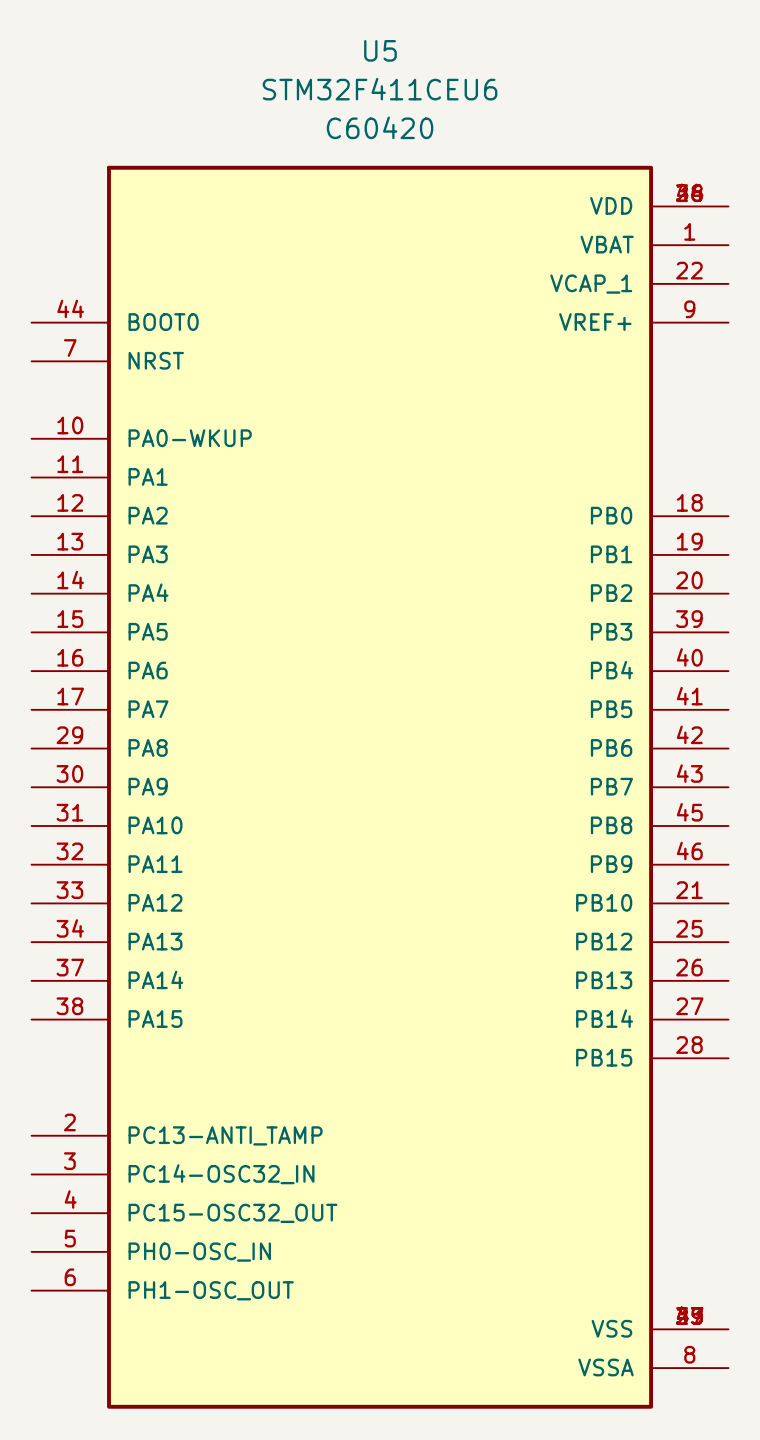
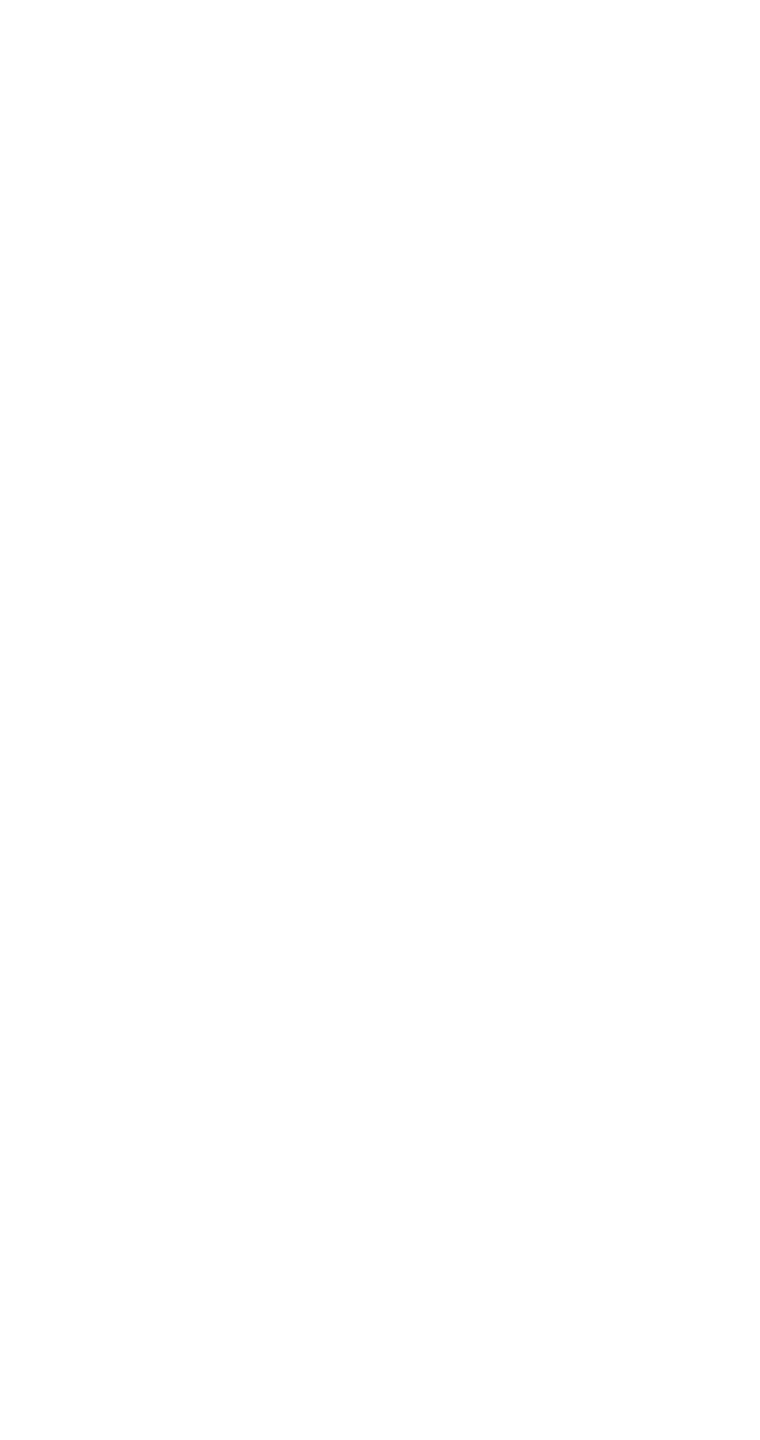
U5: STM32F411CEU6 (380, 787) -> none

